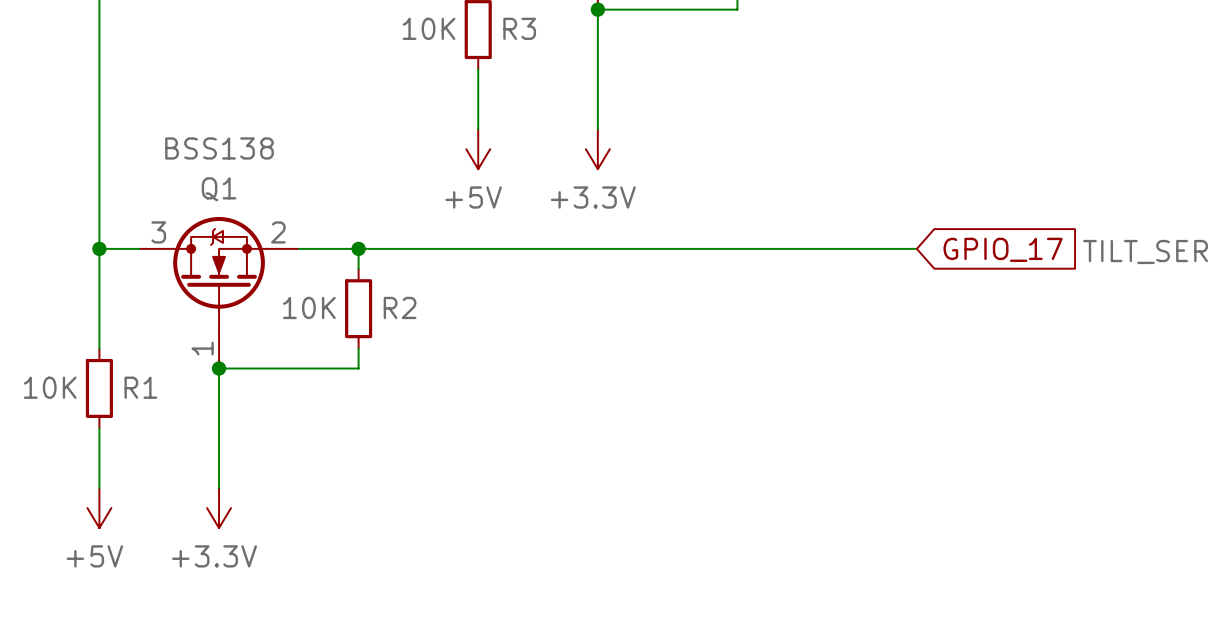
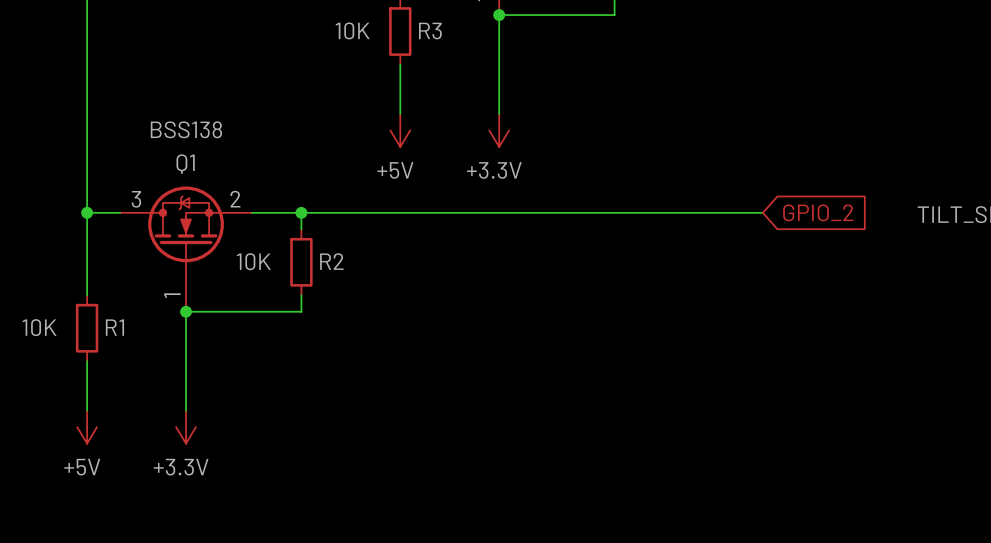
global label: GPIO_17 (1003, 249) -> GPIO_2 (818, 212)

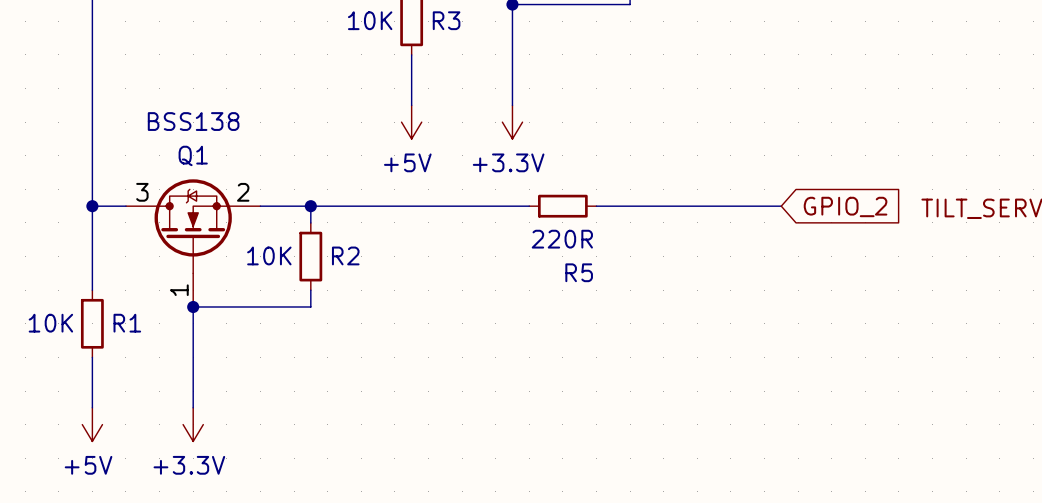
wire: (515, 212) (581, 212) -> none
R5: none -> 220R (562, 206)

